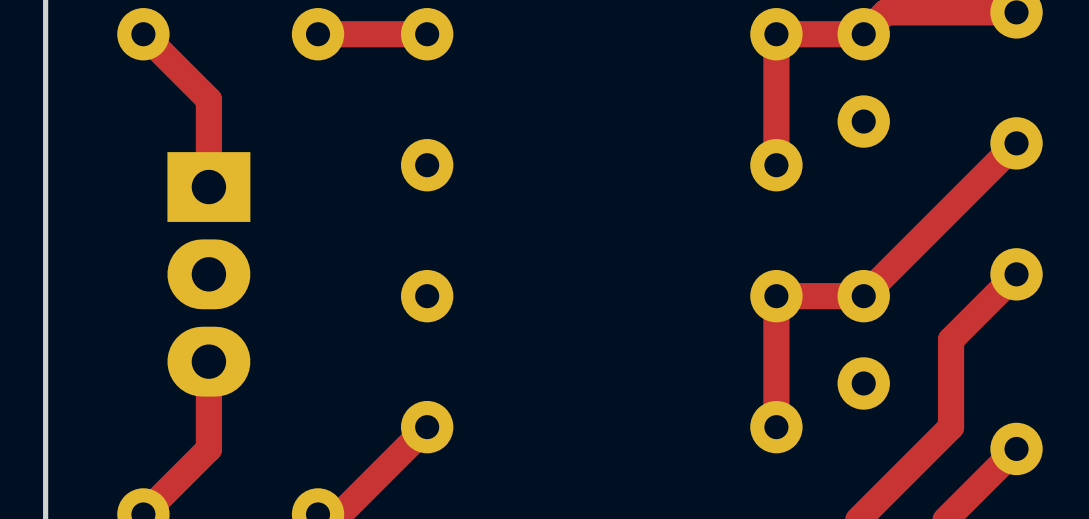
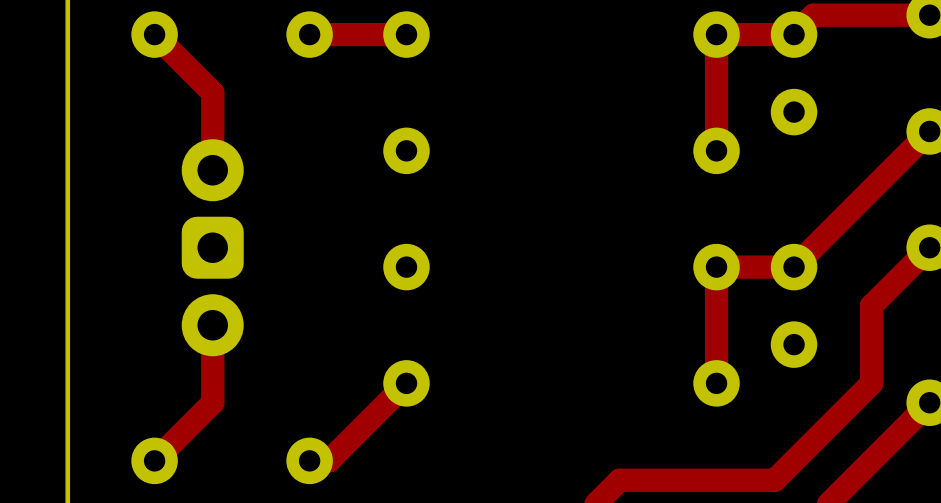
part footprint: [167, 152, 251, 397] -> [181, 139, 244, 357]

